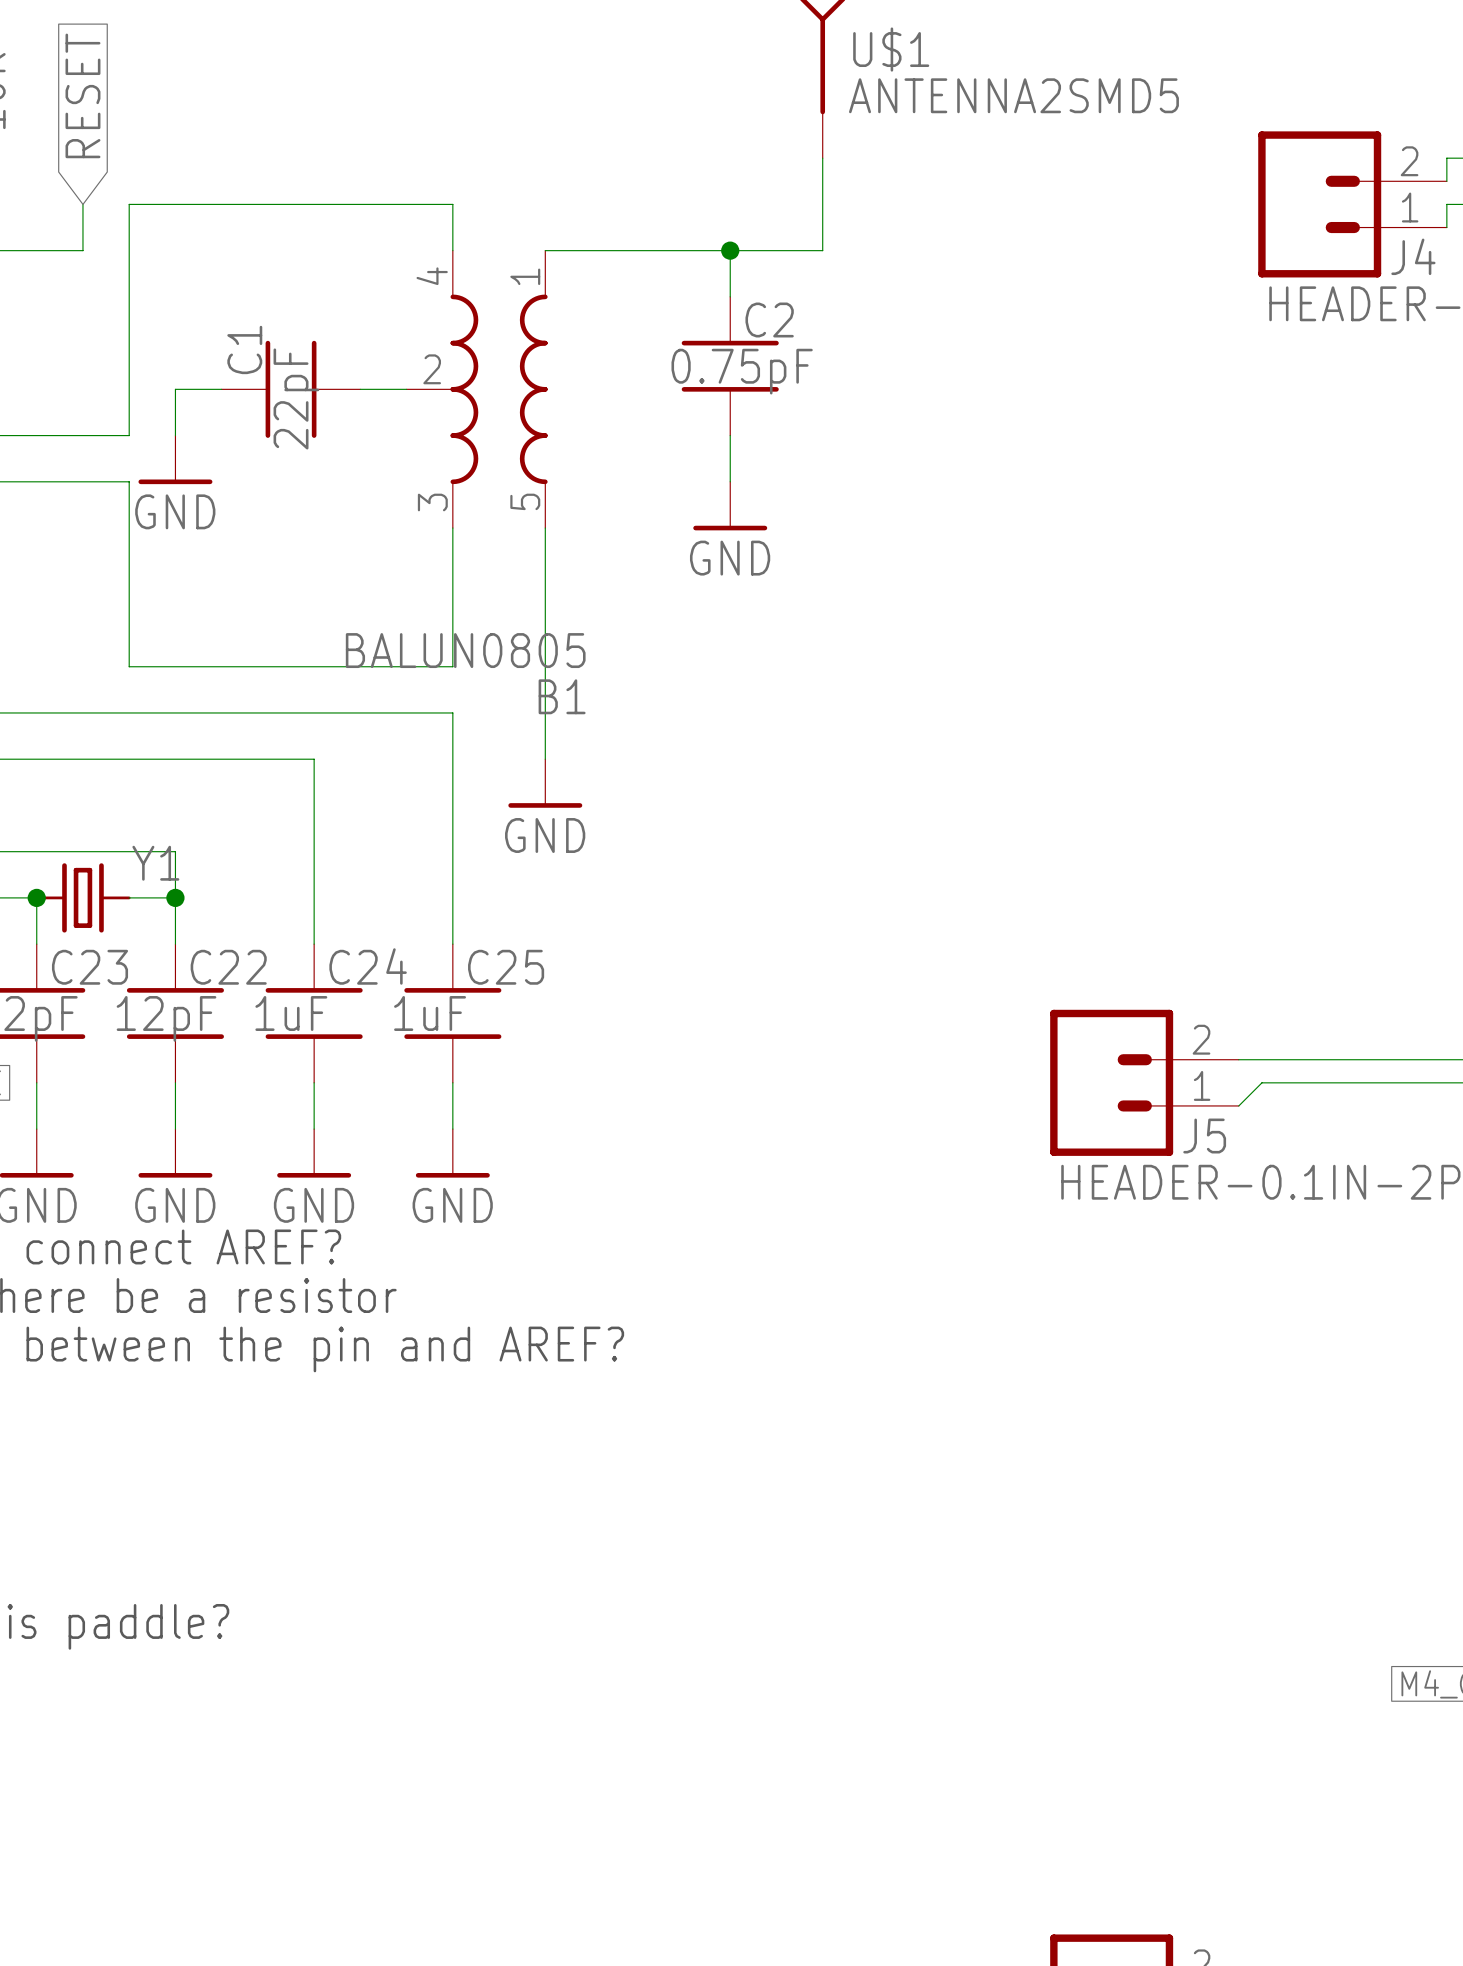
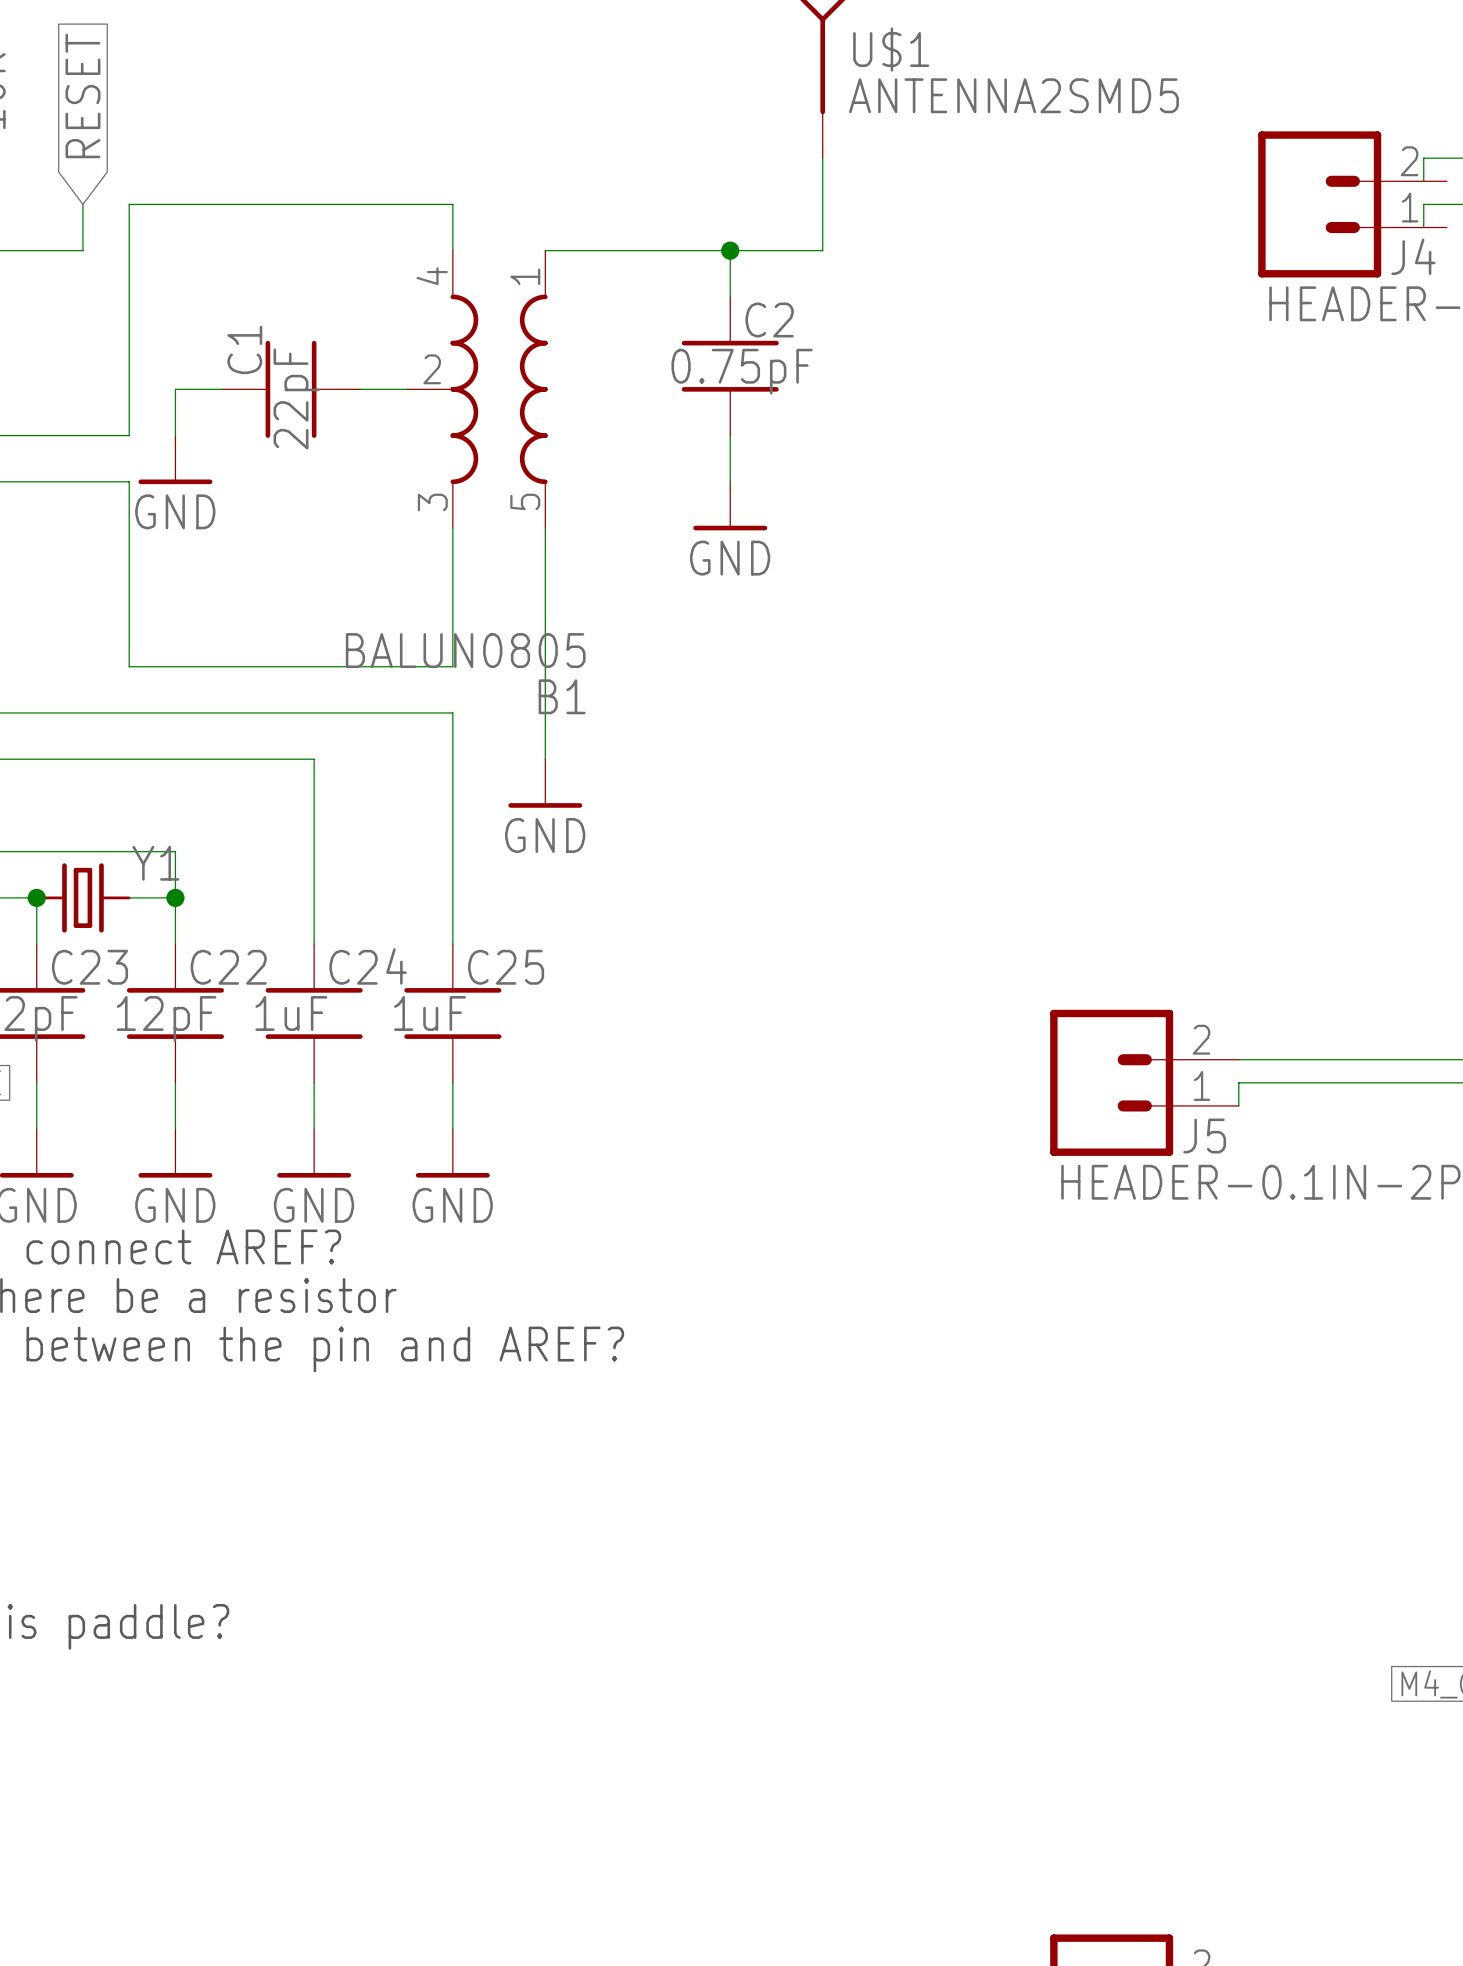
wire: (1446, 158) (1446, 181) -> (1446, 158) (1423, 158) (1423, 181)
wire: (1446, 204) (1446, 227) -> (1446, 204) (1423, 204) (1423, 227)
wire: (1261, 1082) (1238, 1105) -> (1261, 1082) (1238, 1082) (1238, 1105)

